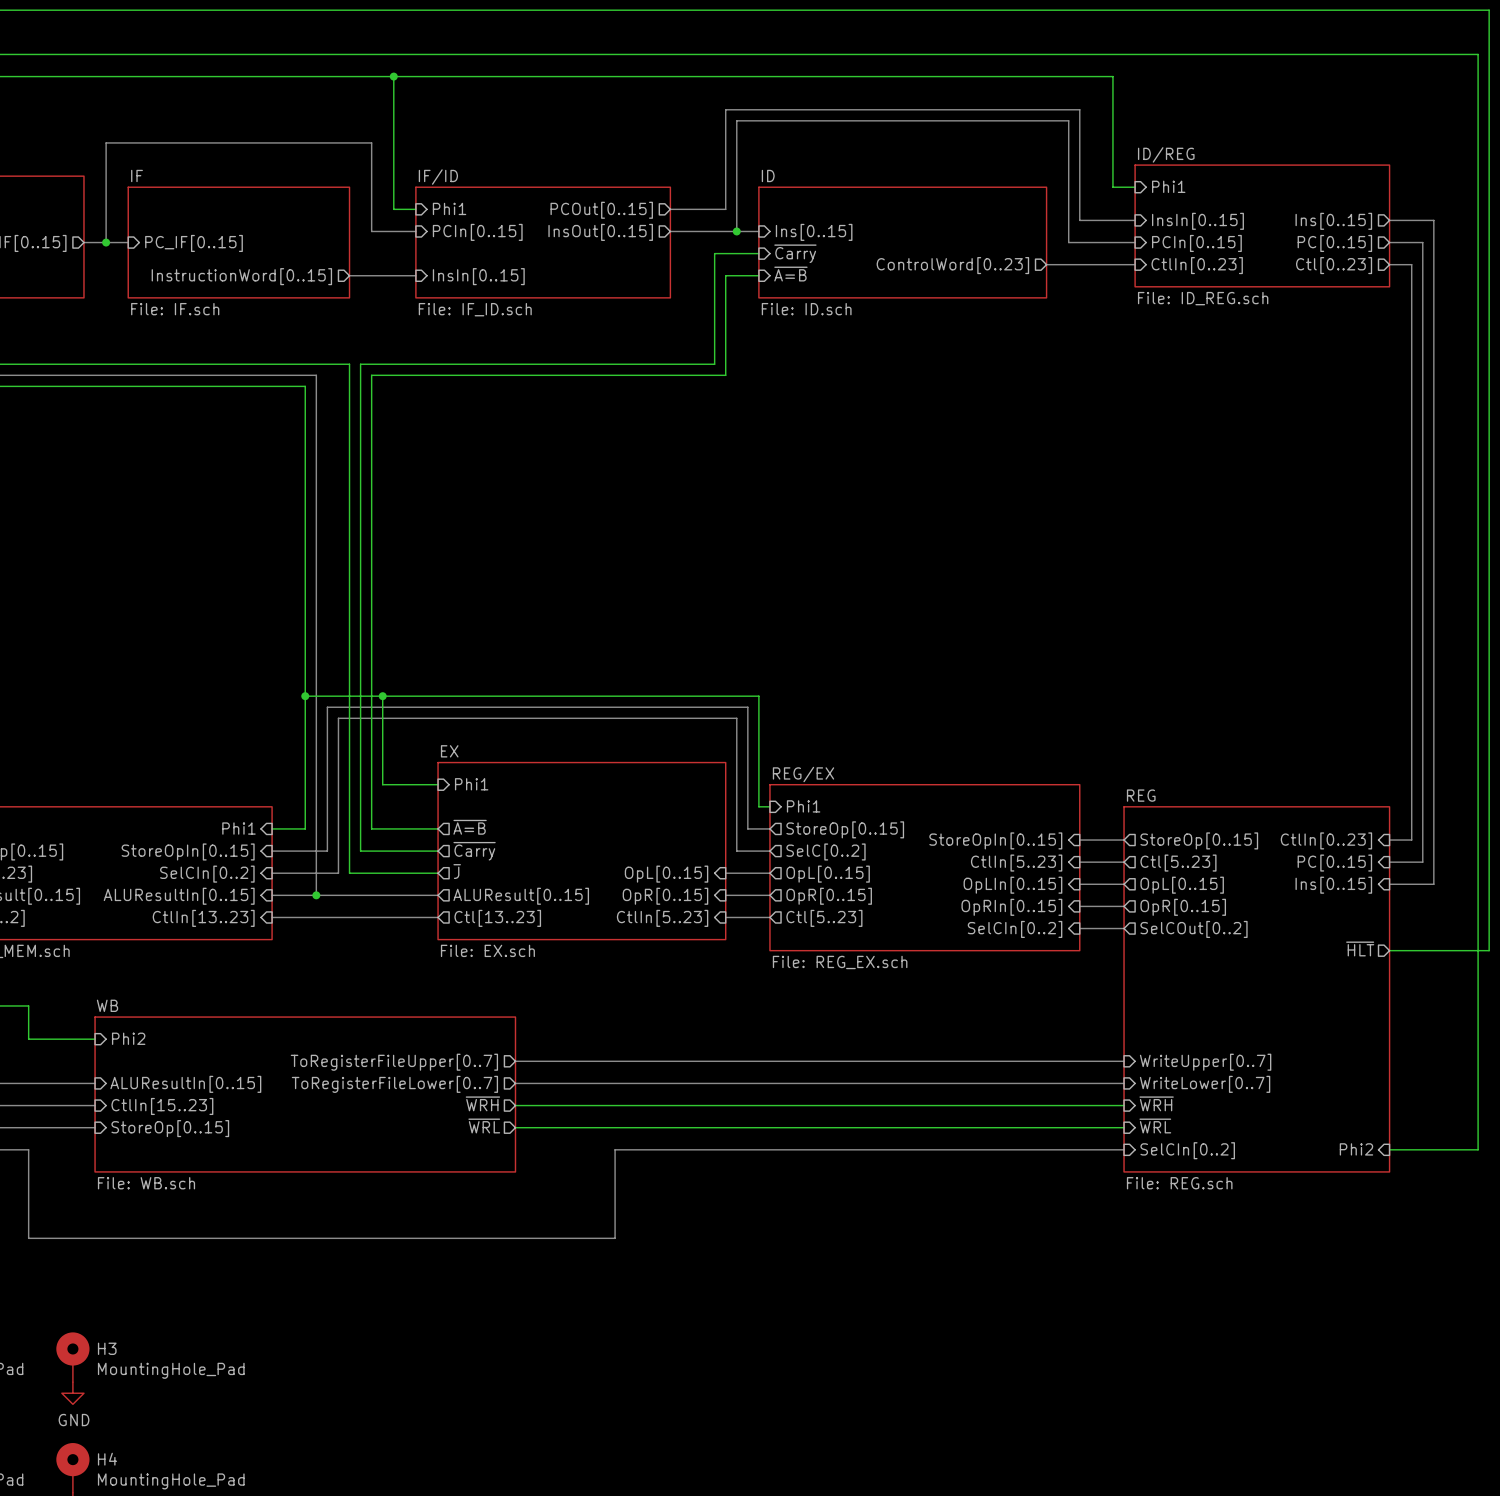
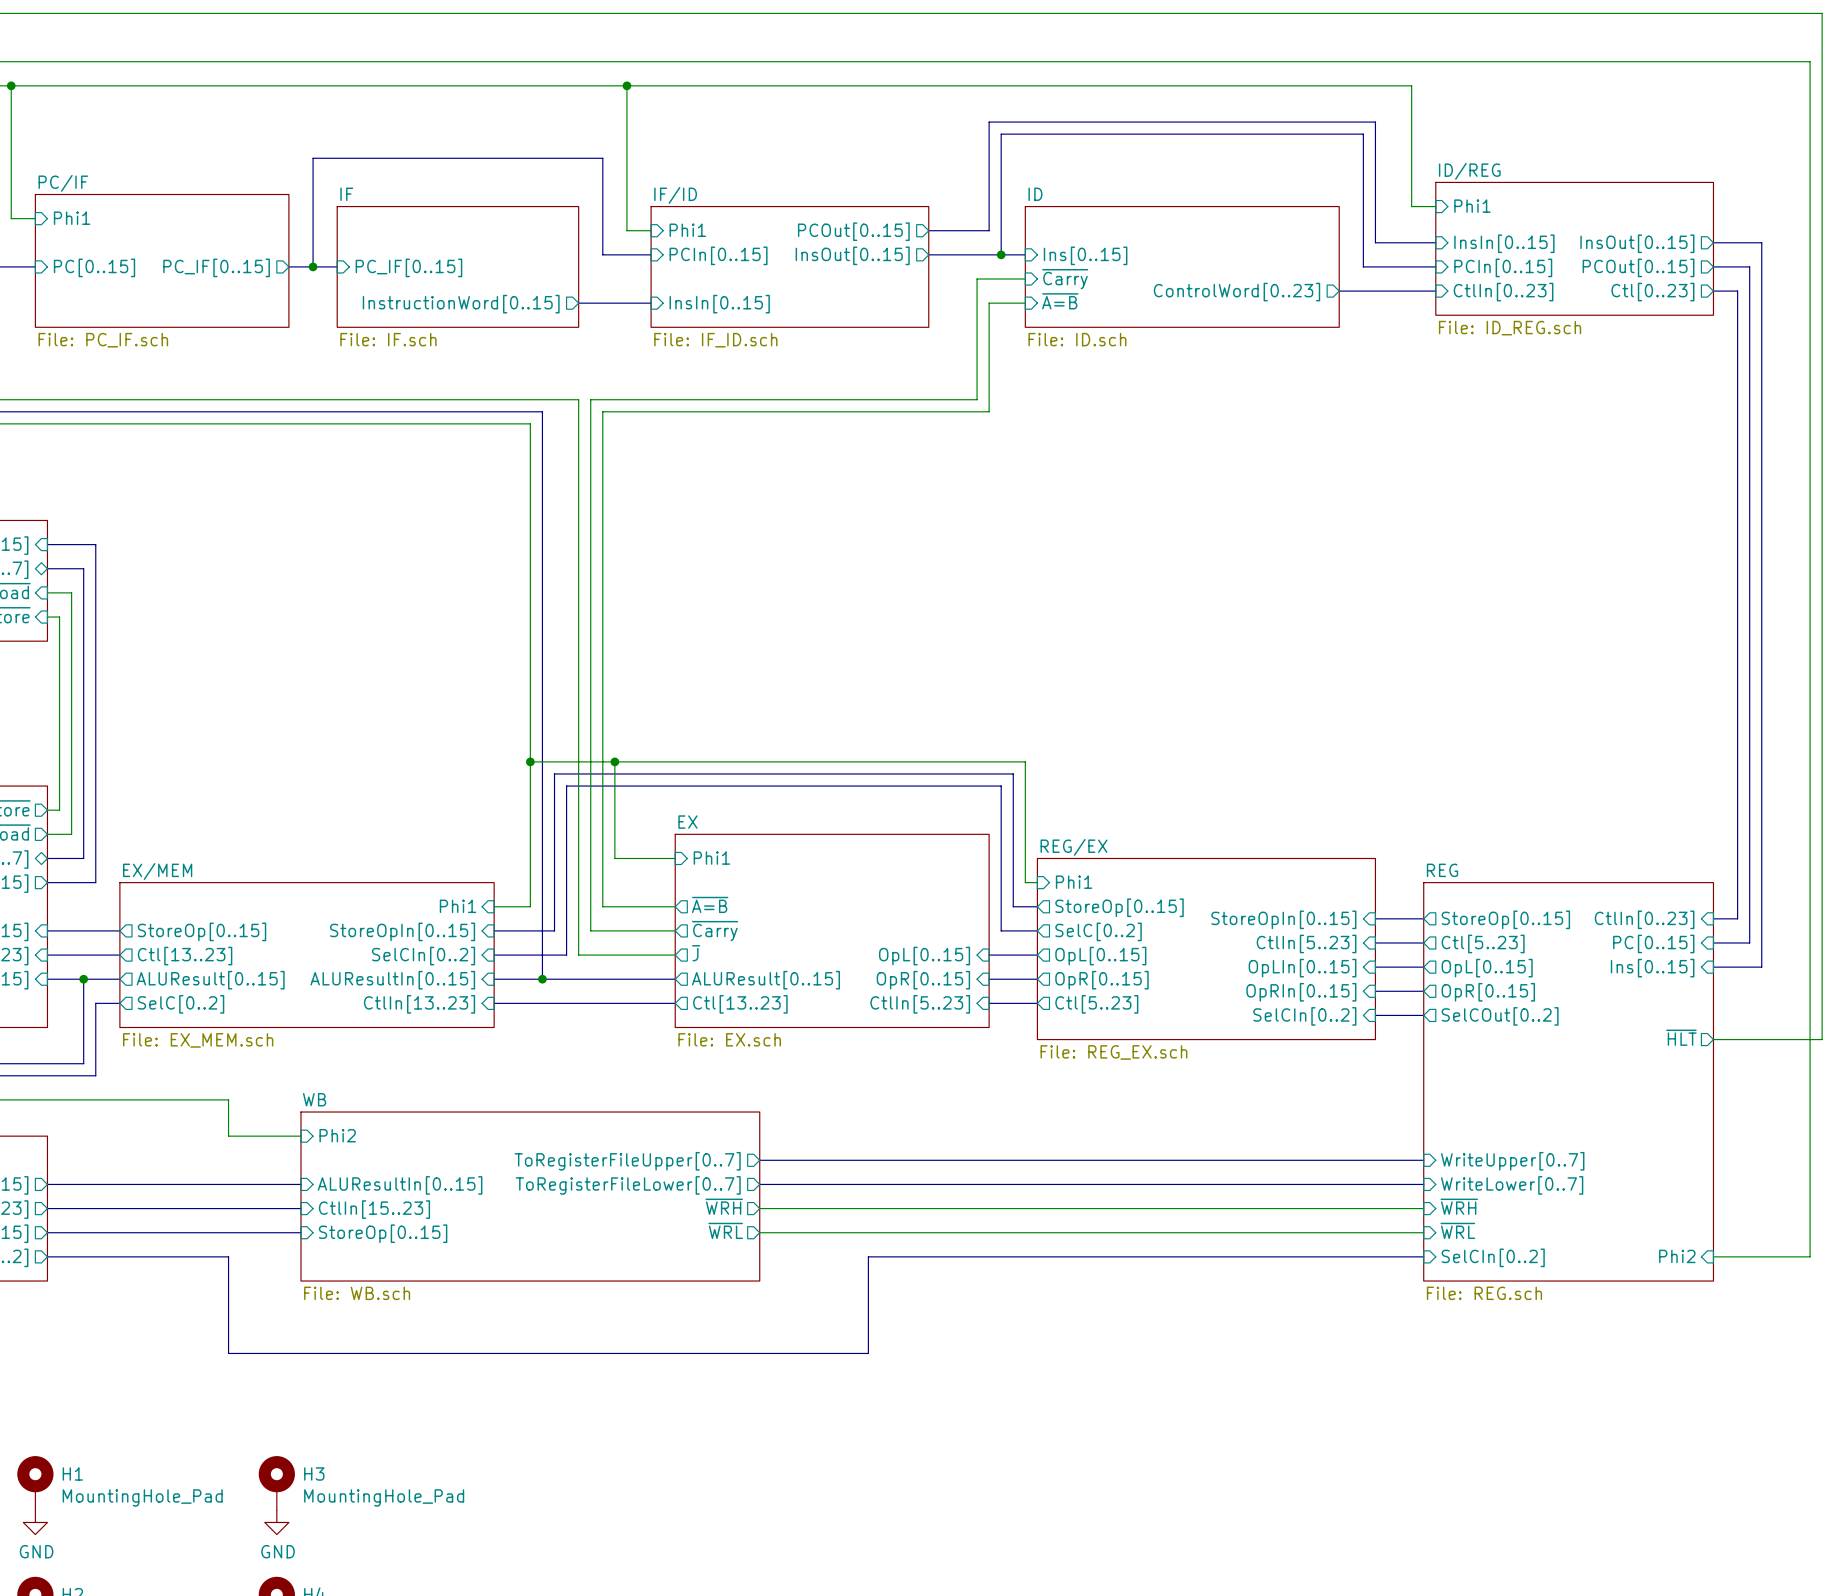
sheet pin: Ins[0..15] (1333, 221) -> InsOut[0..15] (1637, 243)
sheet pin: PC[0..15] (1334, 243) -> PCOut[0..15] (1638, 267)

